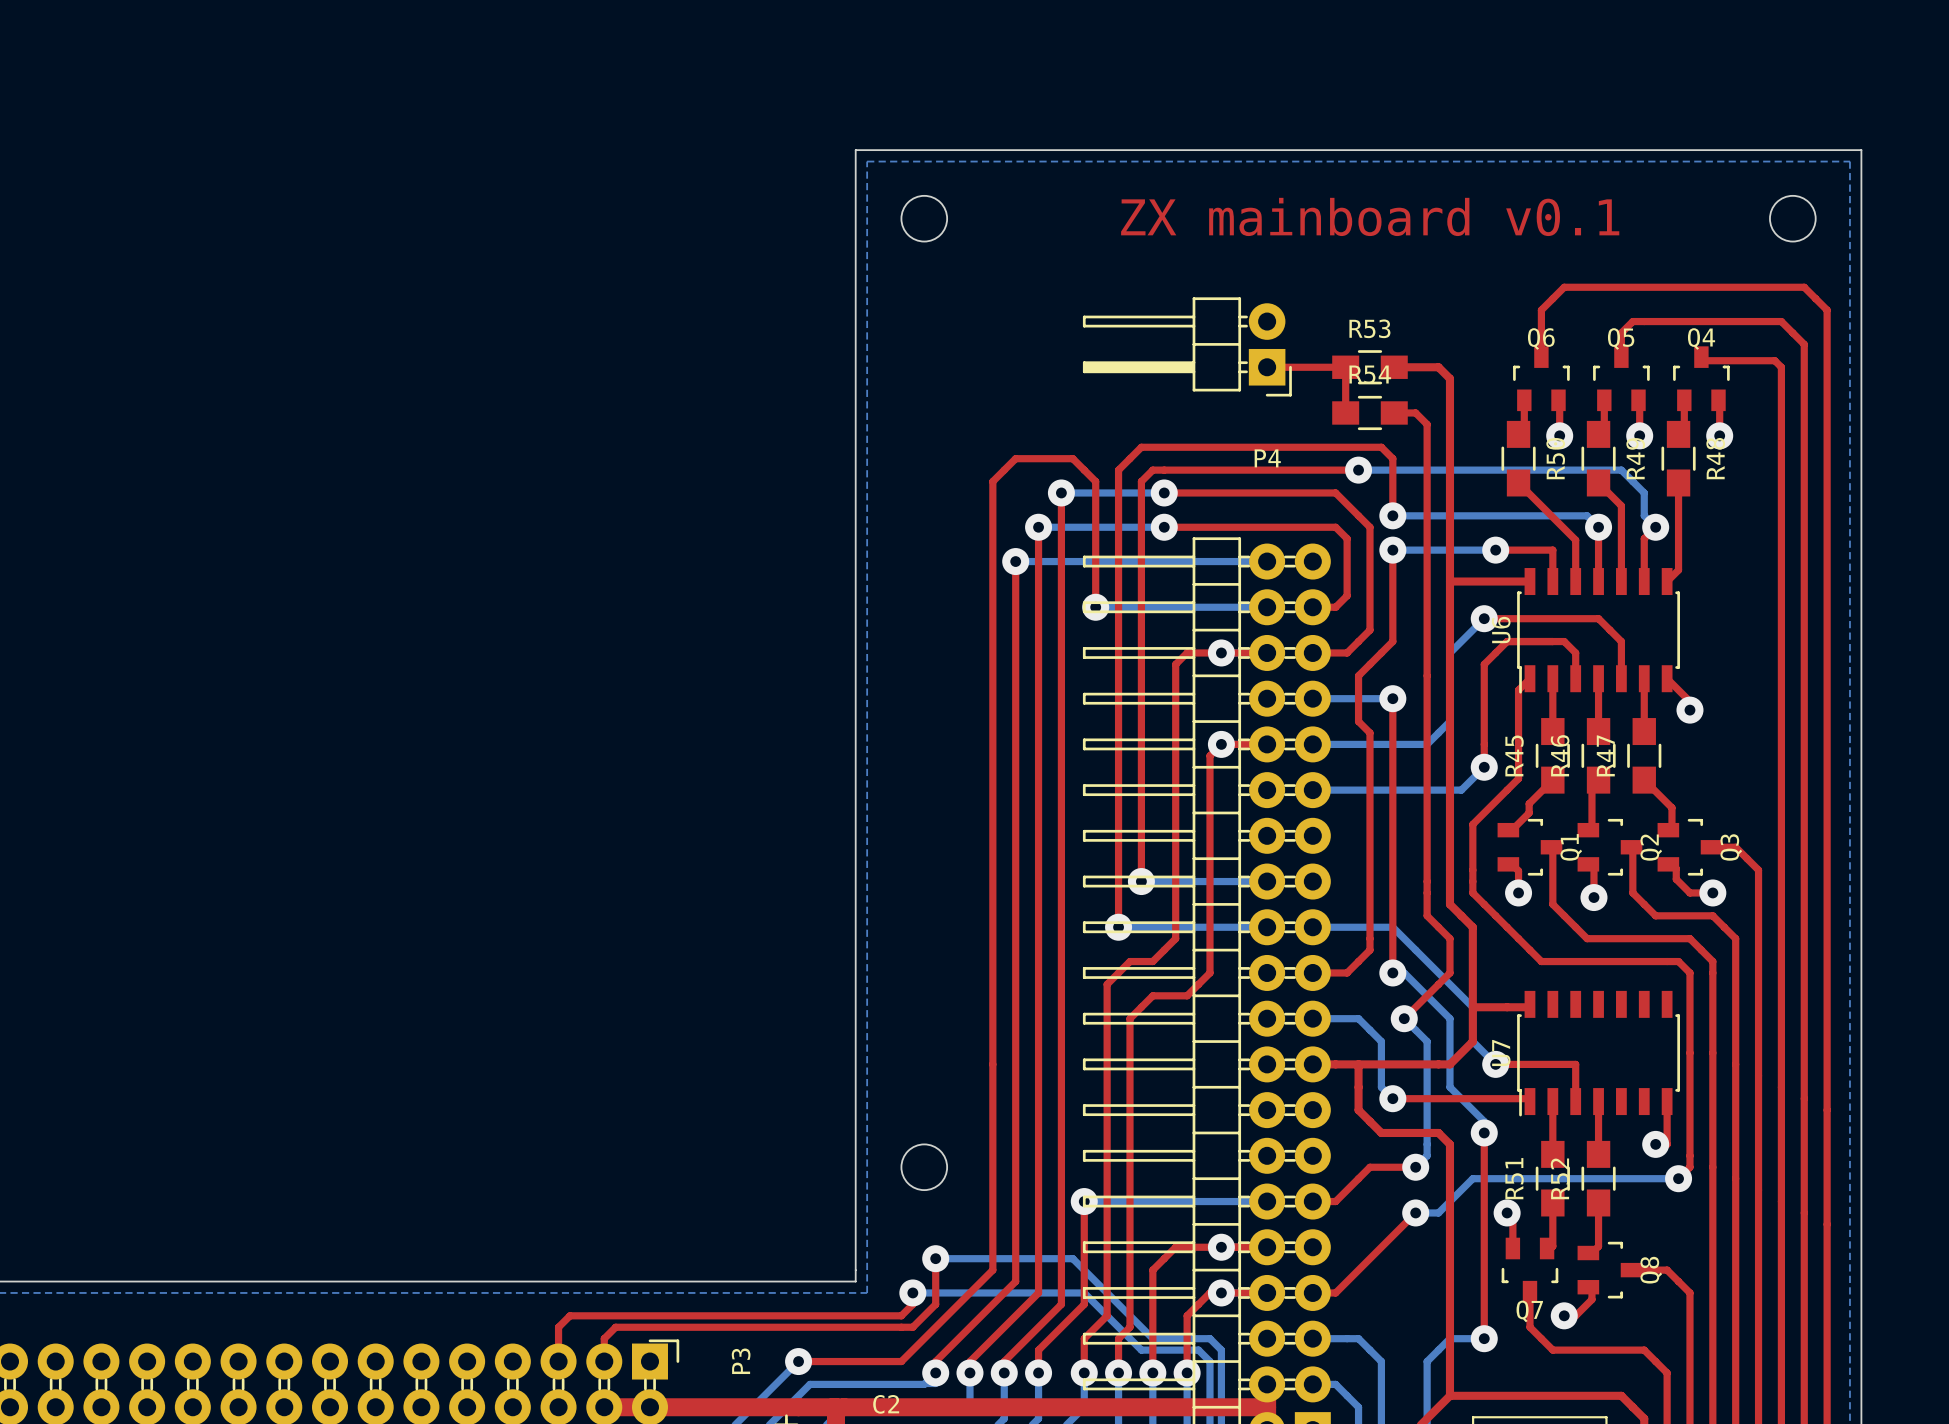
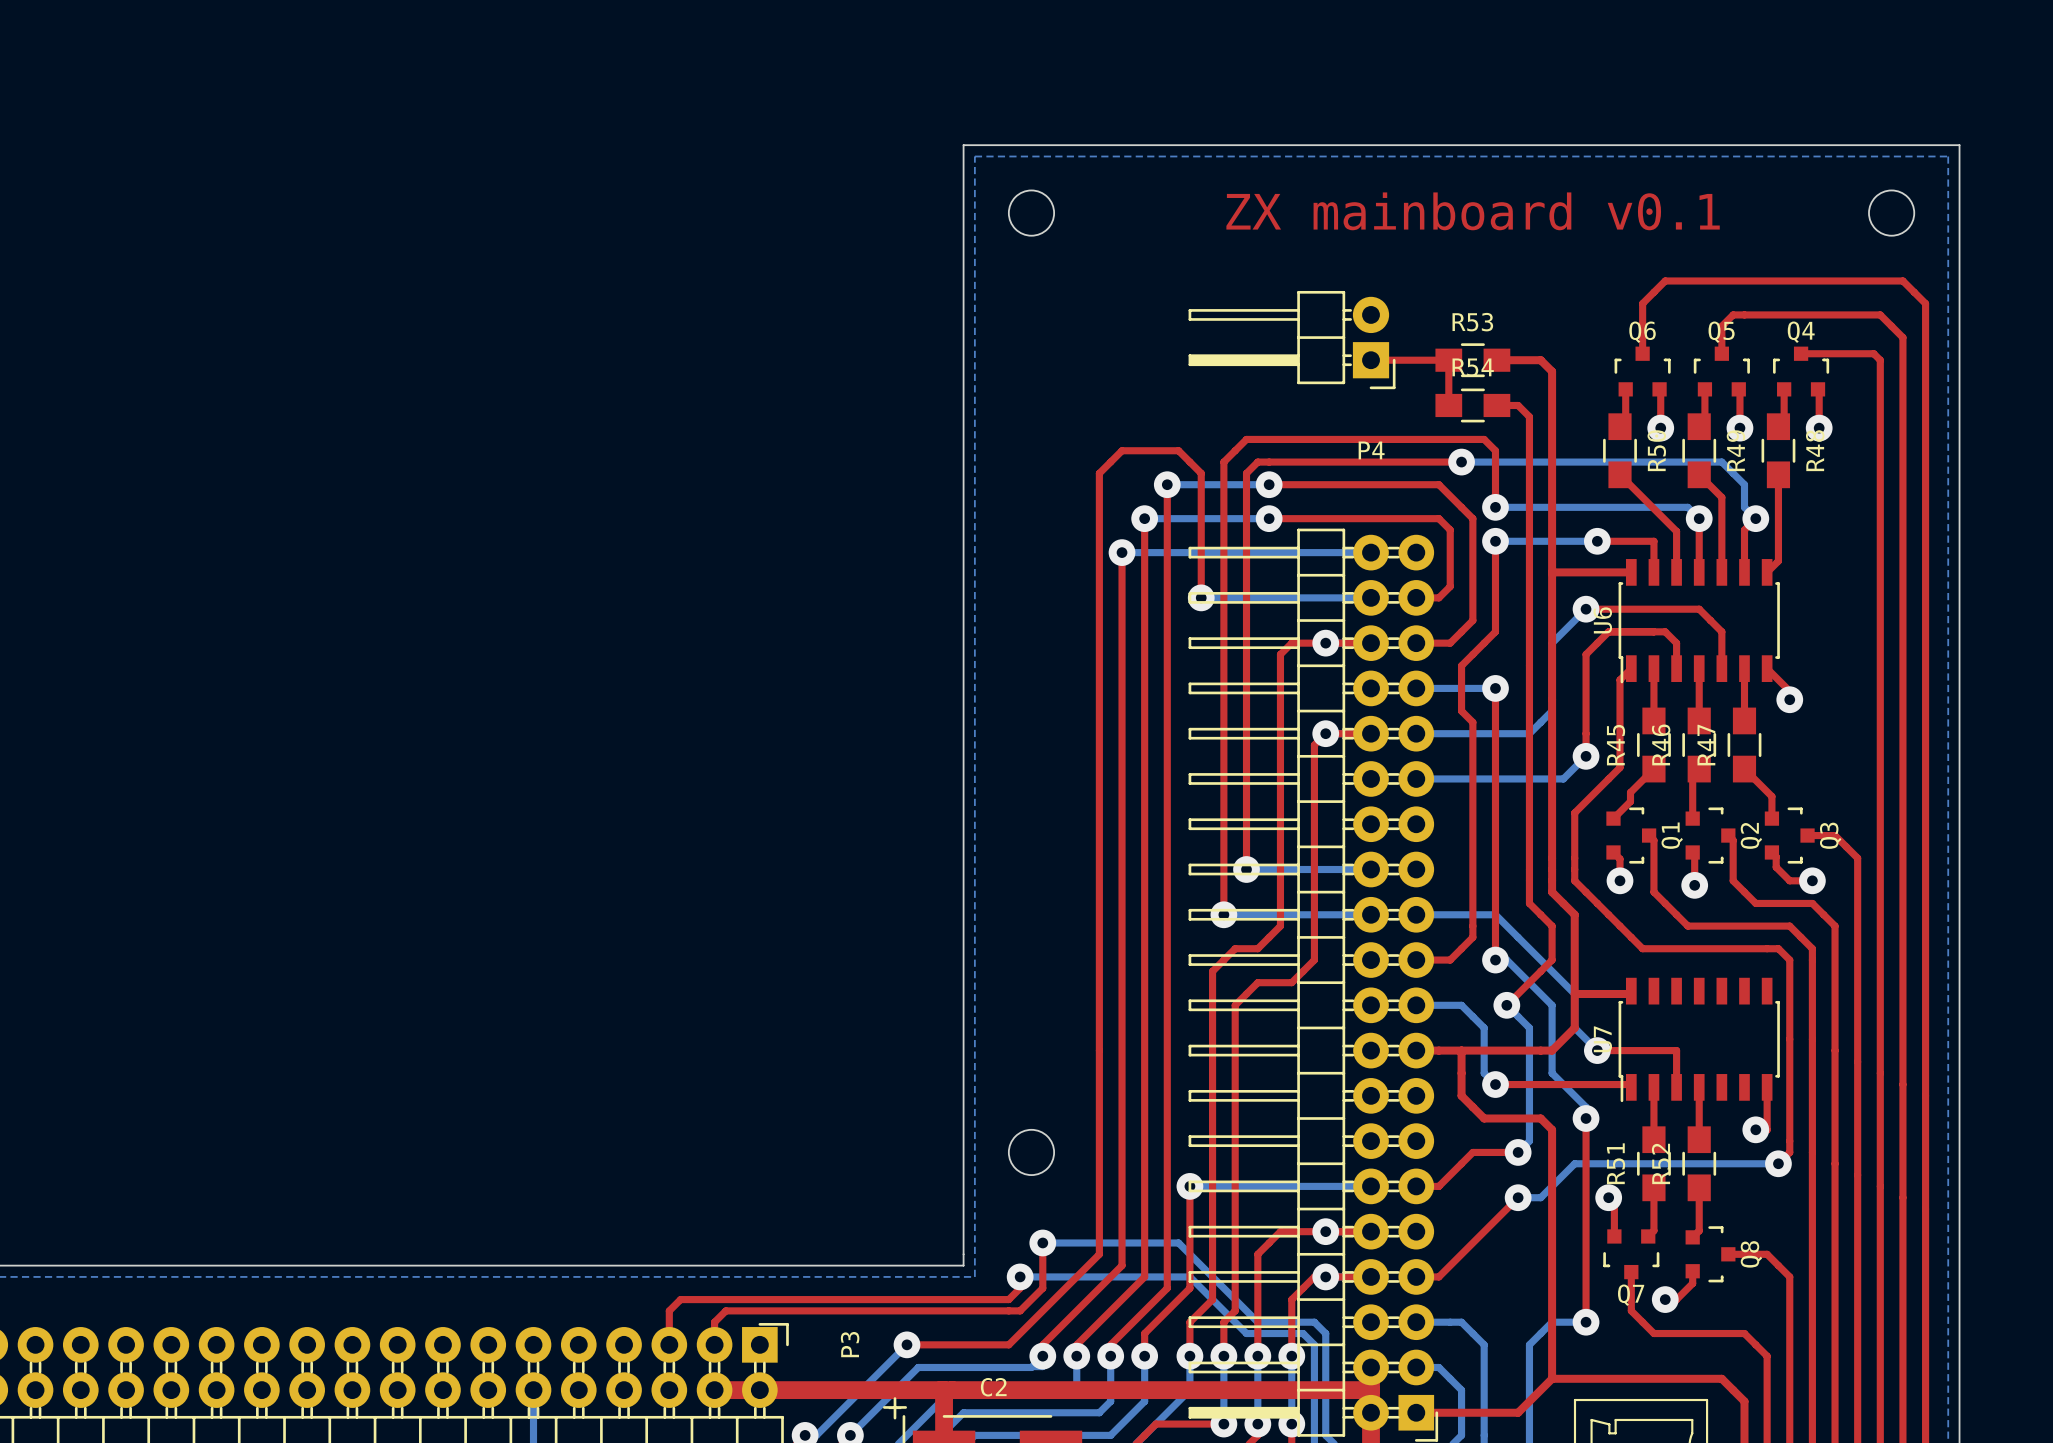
Q6 footprint: [1513, 346, 1570, 412] -> [1614, 346, 1671, 397]
Q5 footprint: [1593, 346, 1650, 412] -> [1693, 346, 1750, 397]
Q4 footprint: [1673, 346, 1730, 412] -> [1773, 346, 1830, 397]
Q1 footprint: [1497, 818, 1563, 876] -> [1606, 807, 1657, 864]
Q2 footprint: [1577, 818, 1643, 876] -> [1685, 807, 1736, 864]
Q3 footprint: [1657, 818, 1723, 876] -> [1764, 807, 1815, 864]
Q7 footprint: [1501, 1237, 1559, 1303] -> [1603, 1229, 1660, 1280]
Q8 footprint: [1577, 1241, 1643, 1299] -> [1685, 1226, 1736, 1283]

